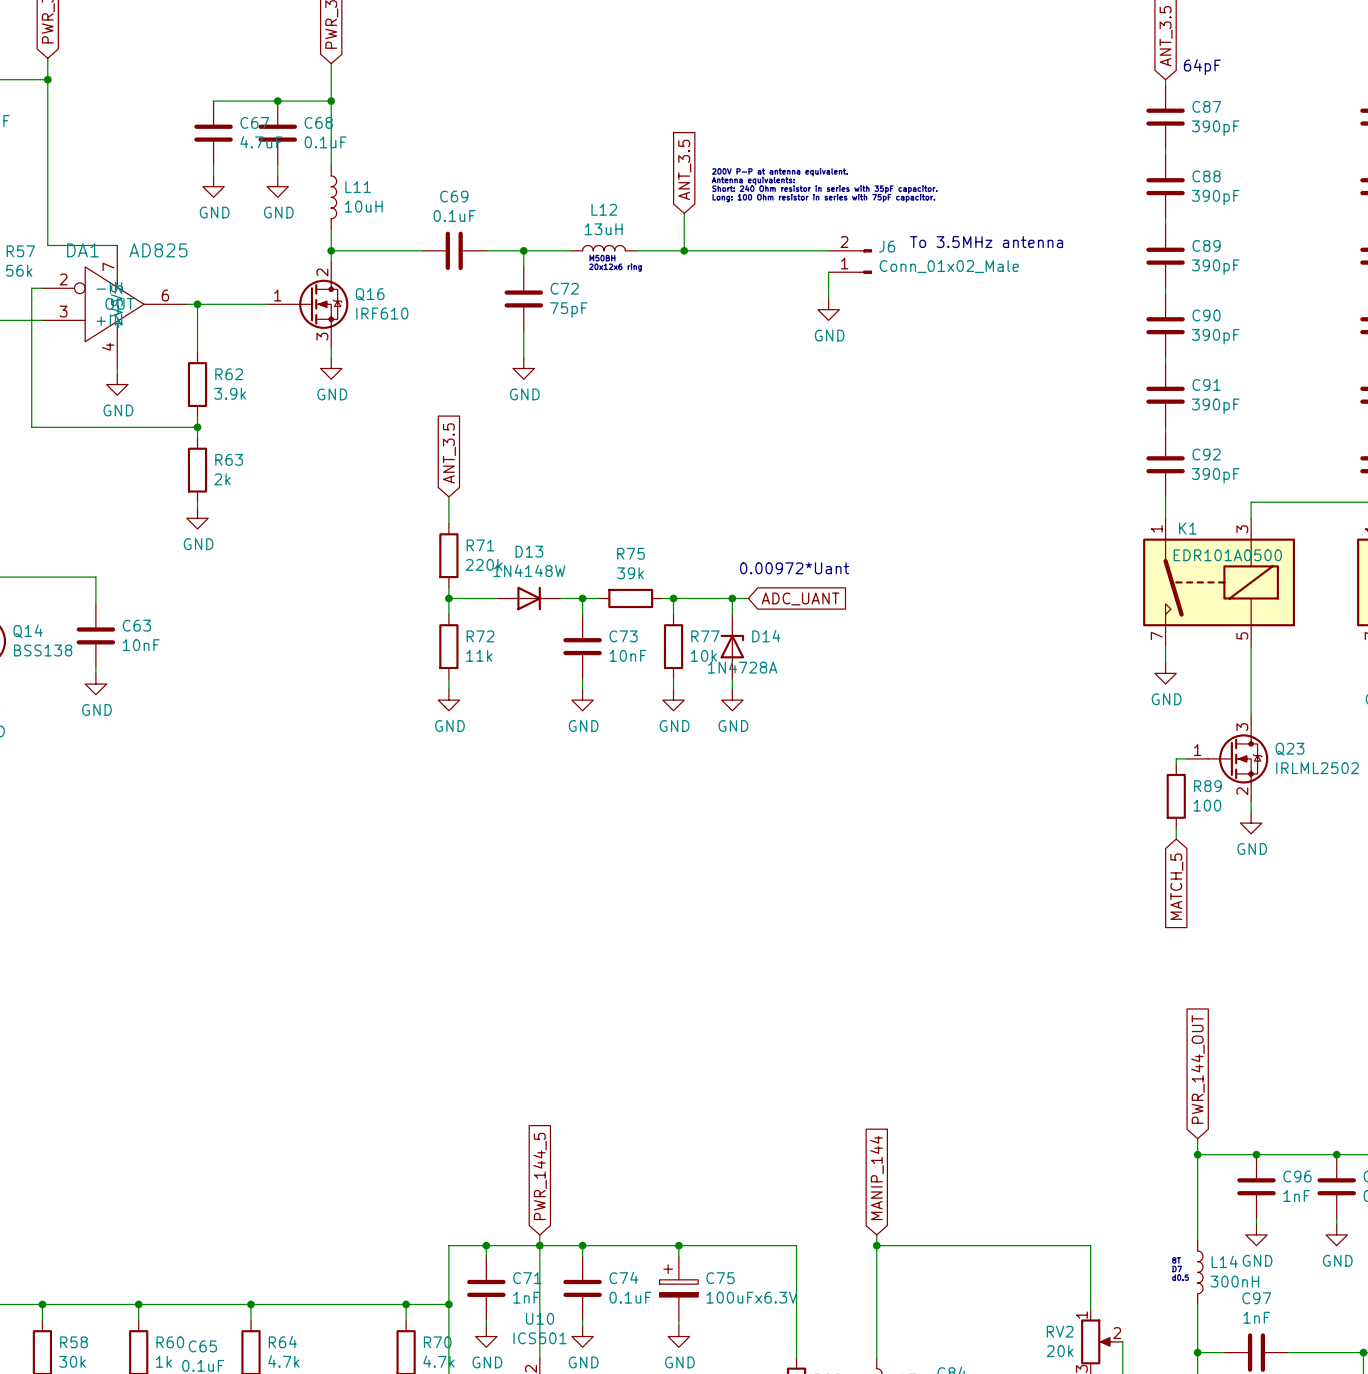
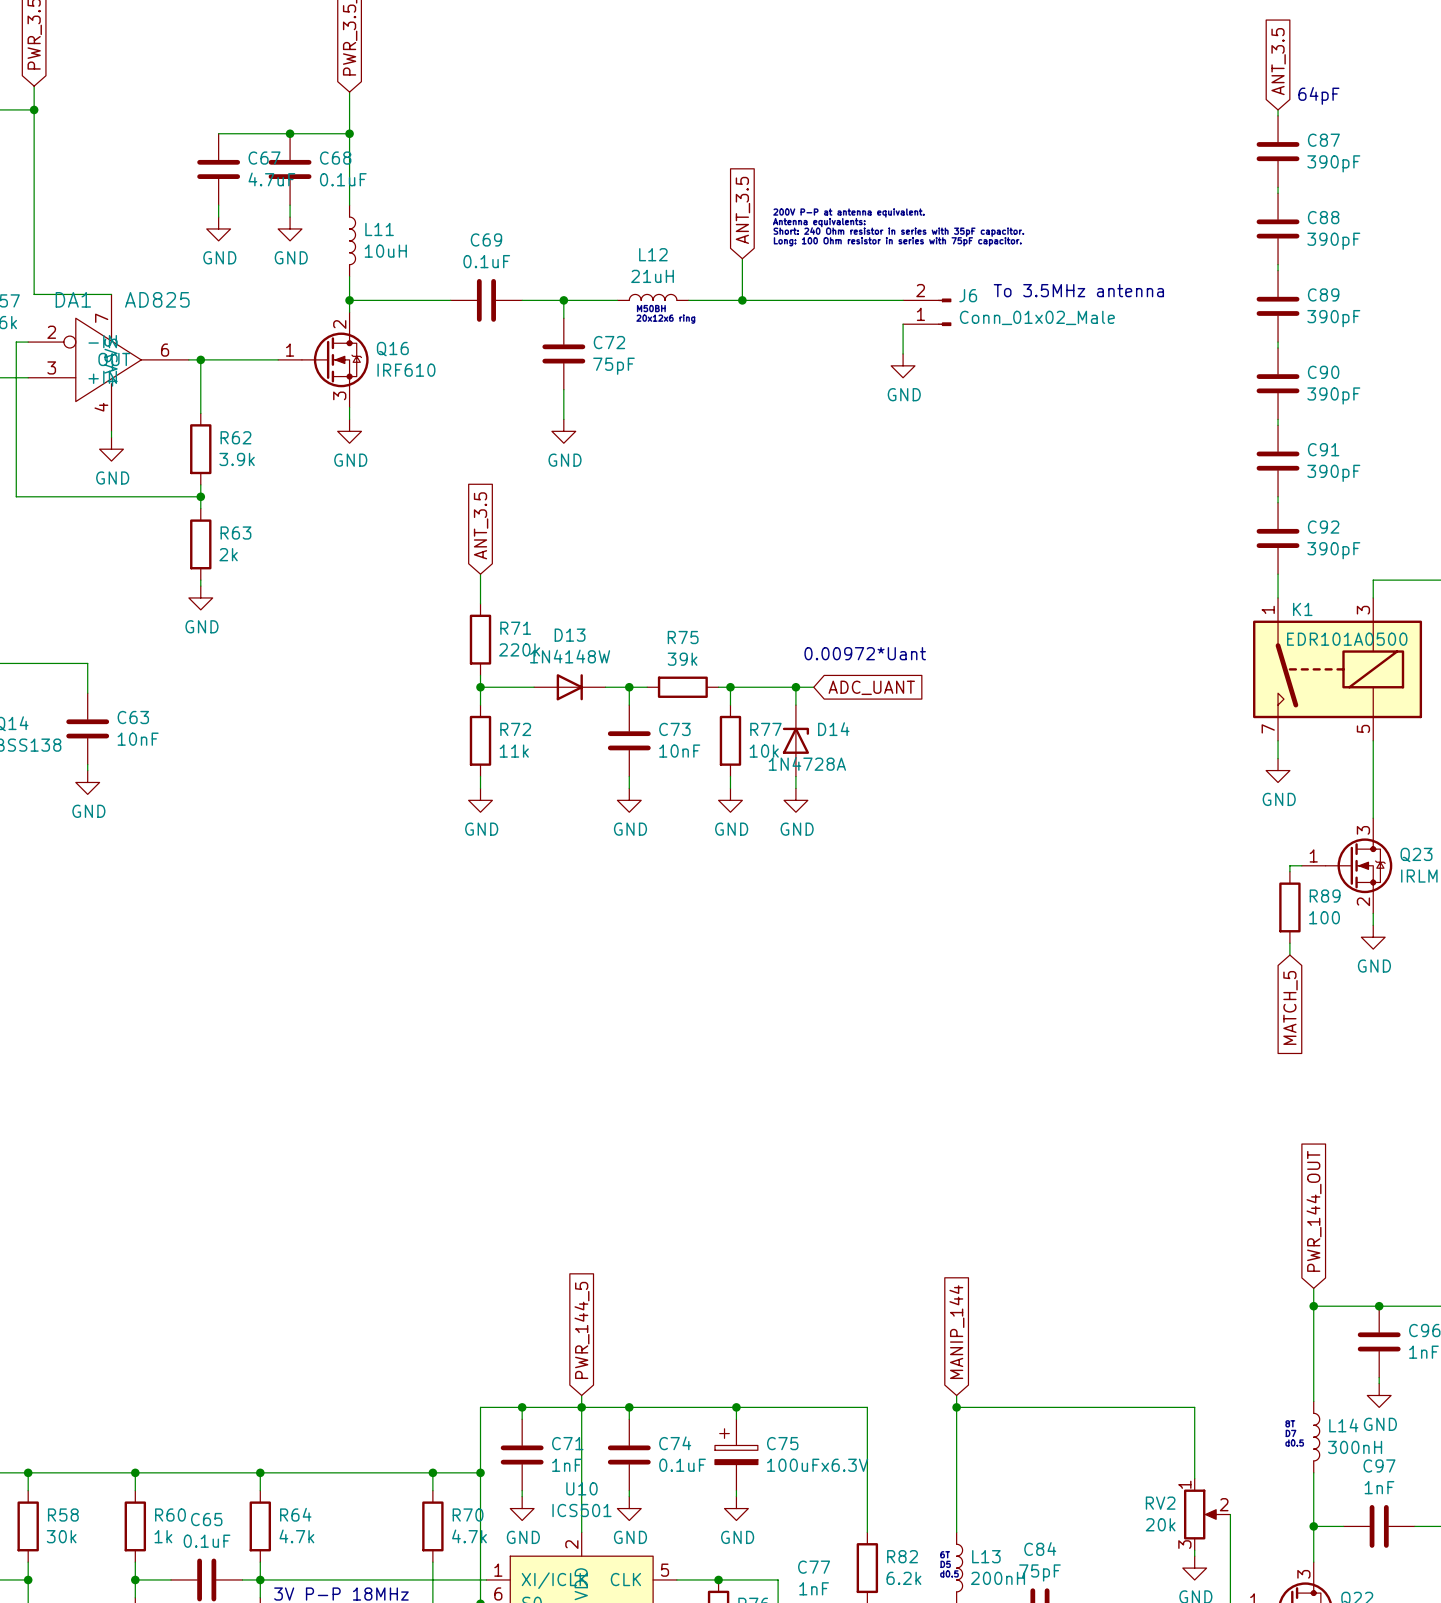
L12 value: 13uH (603, 229) -> 21uH (652, 276)

